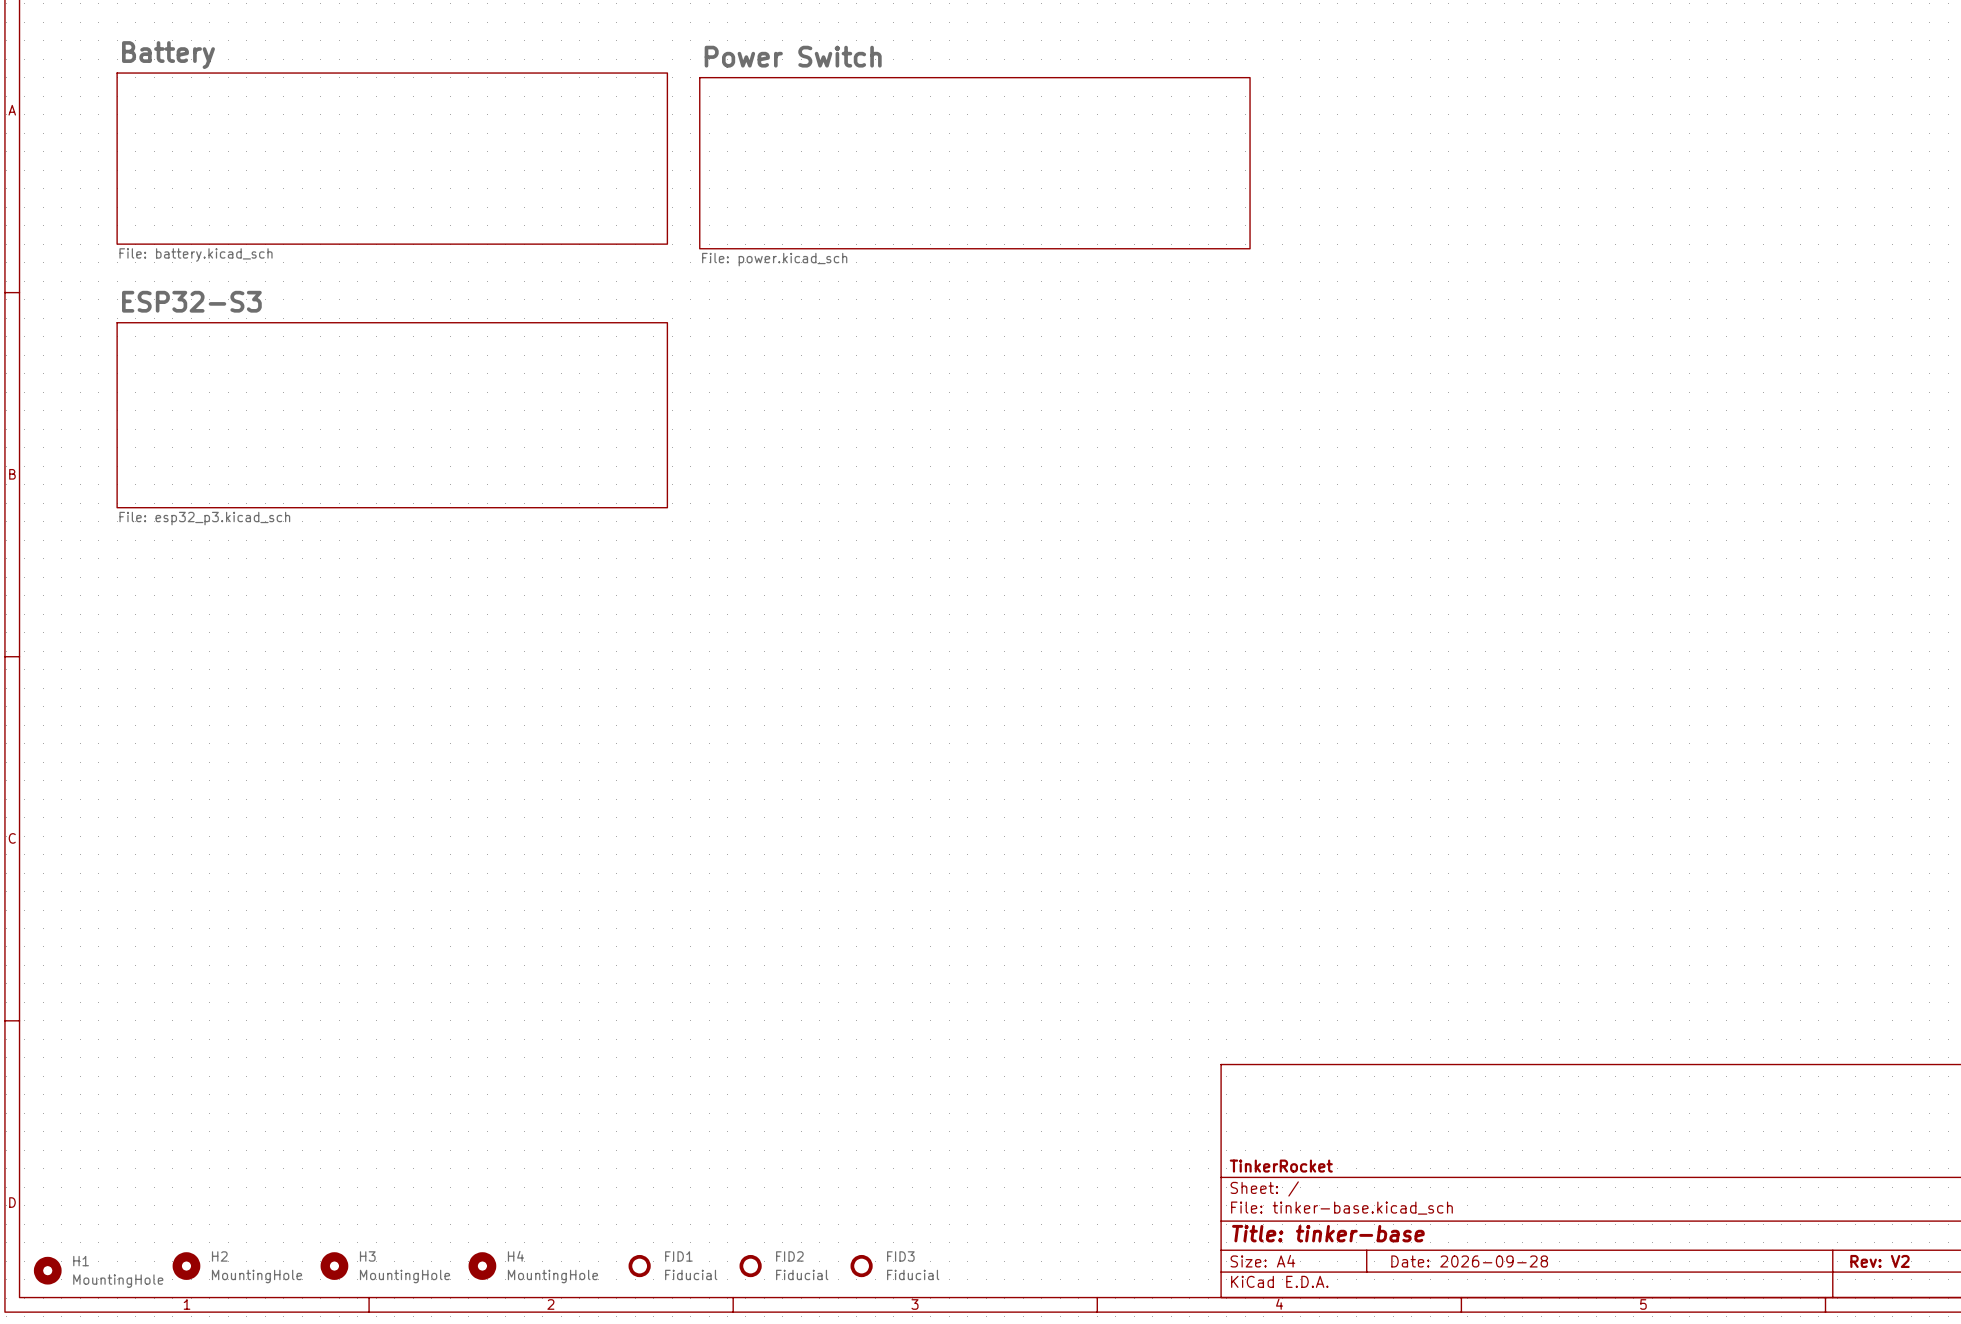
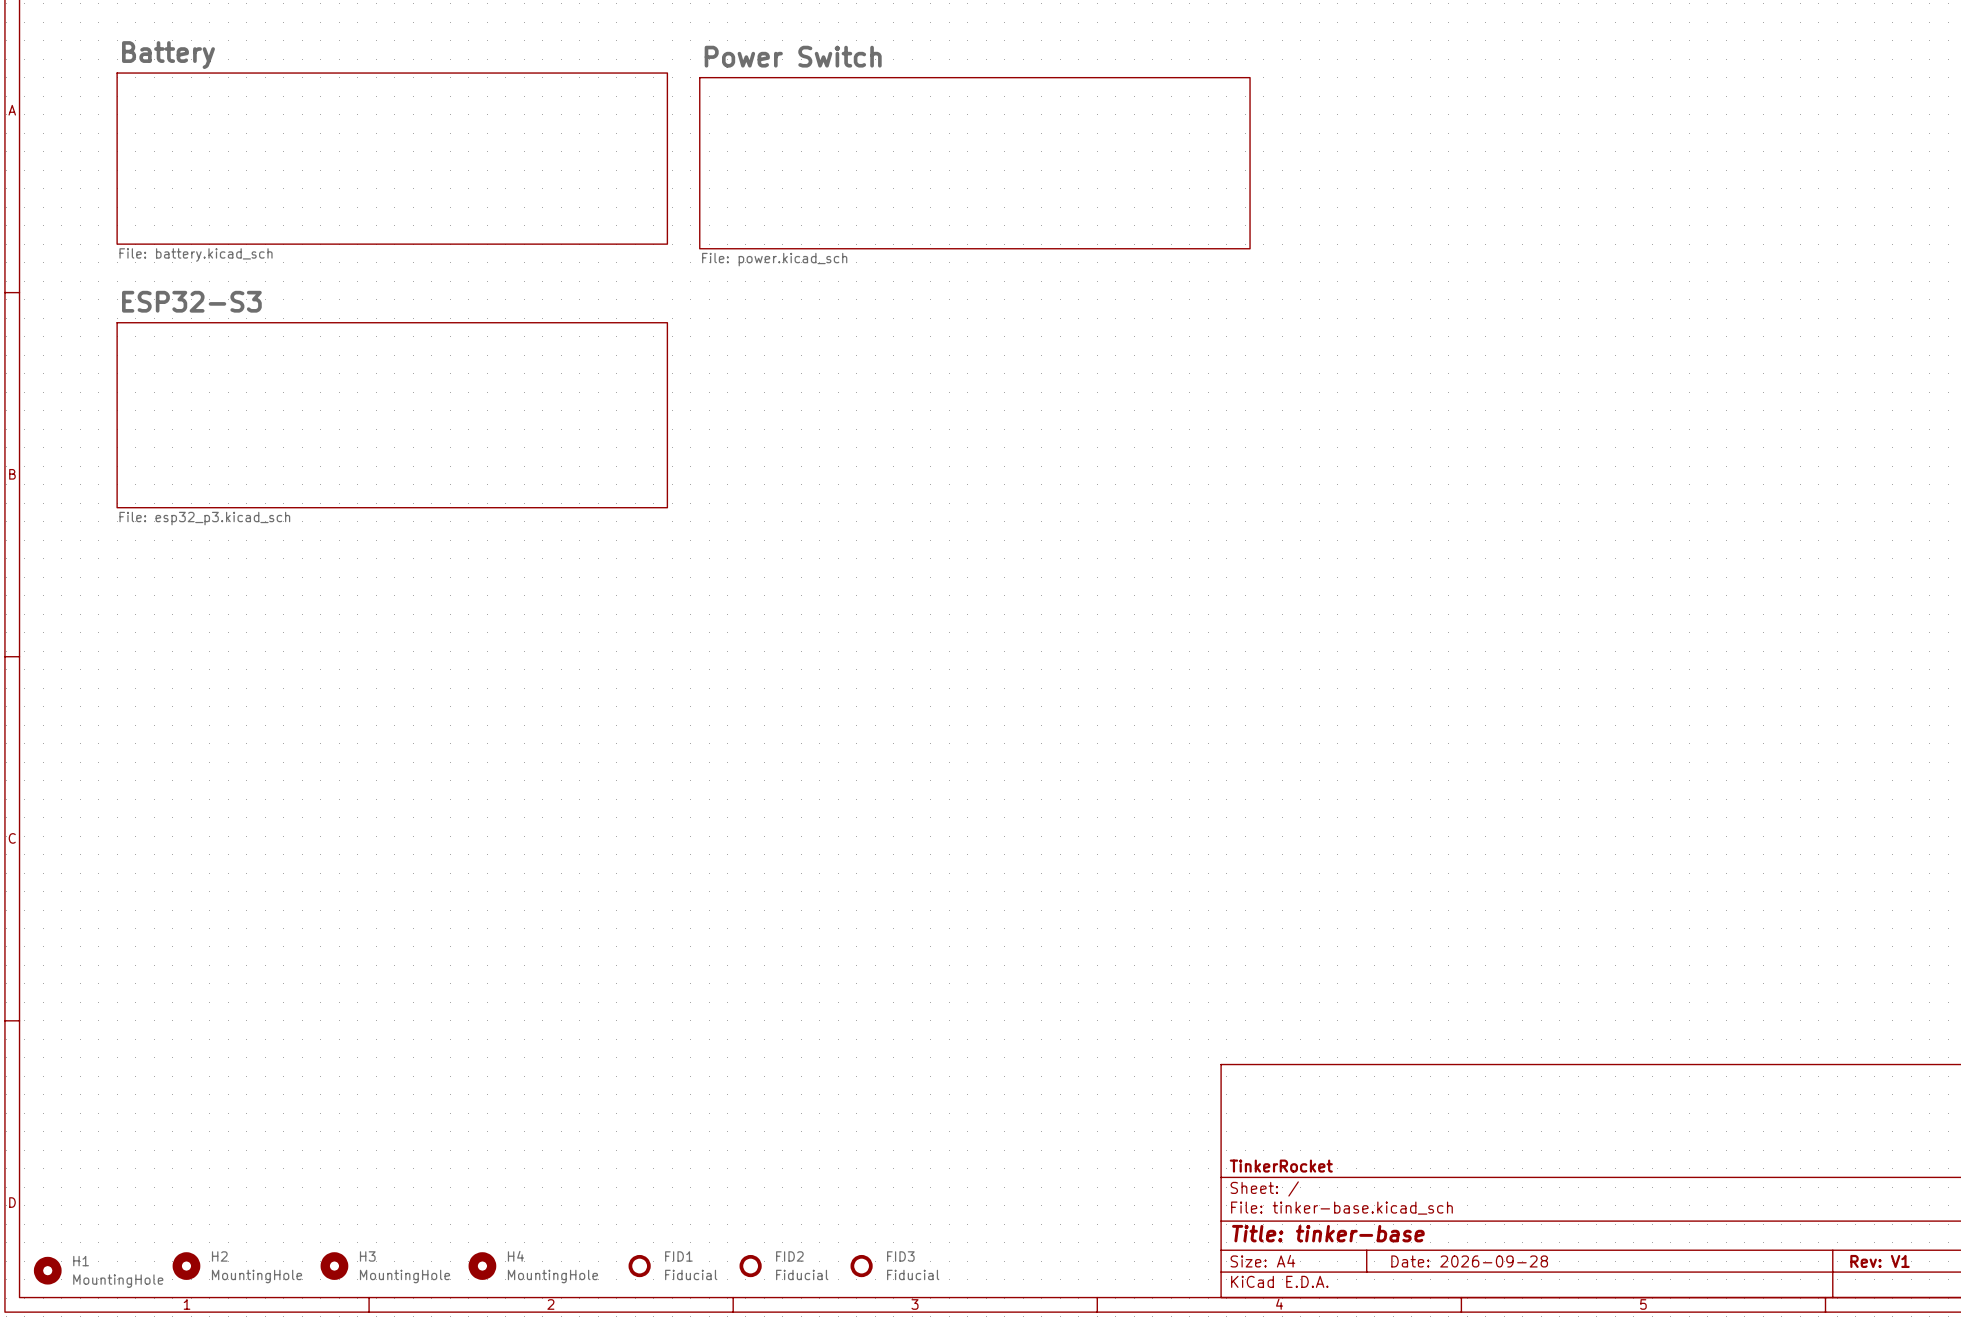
title block: Rev: V2 (1879, 1261) -> Rev: V1 (1879, 1261)

